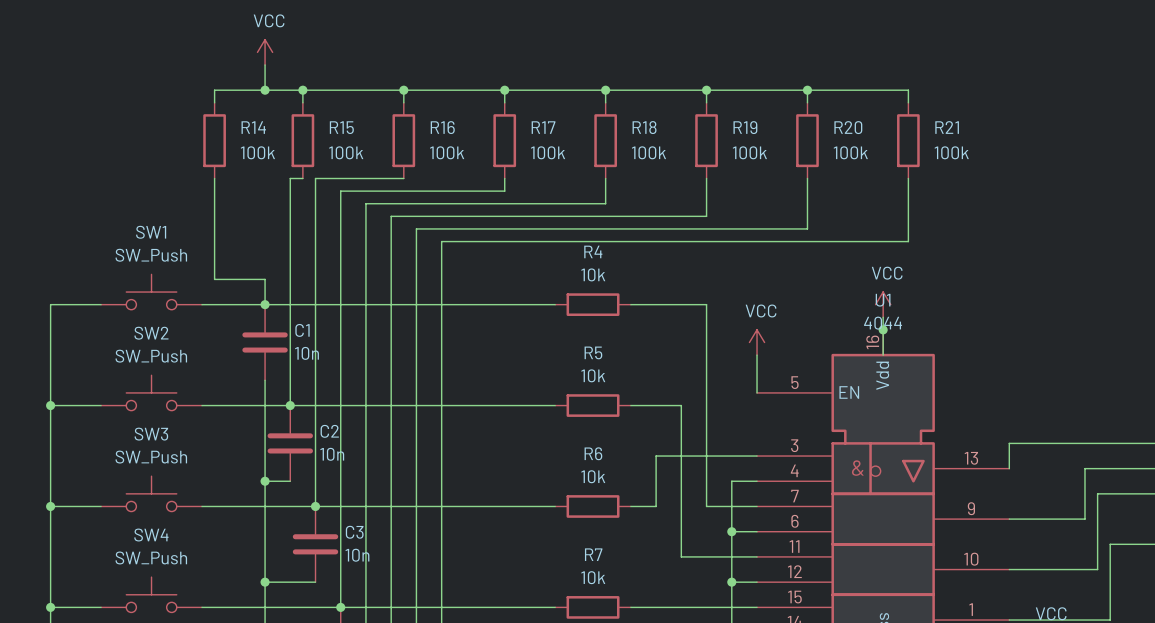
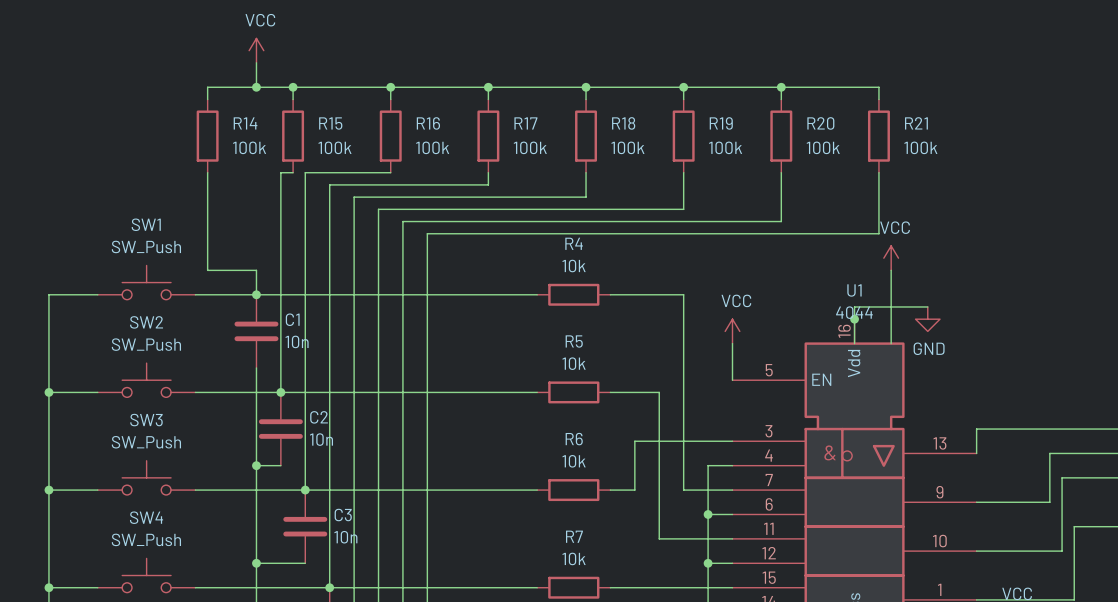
wire: none -> (891, 270) (891, 343)
power symbol position: VCC (883, 304) -> VCC (891, 258)
wire: none -> (854, 306) (927, 306)
power symbol: none -> GND (927, 319)

